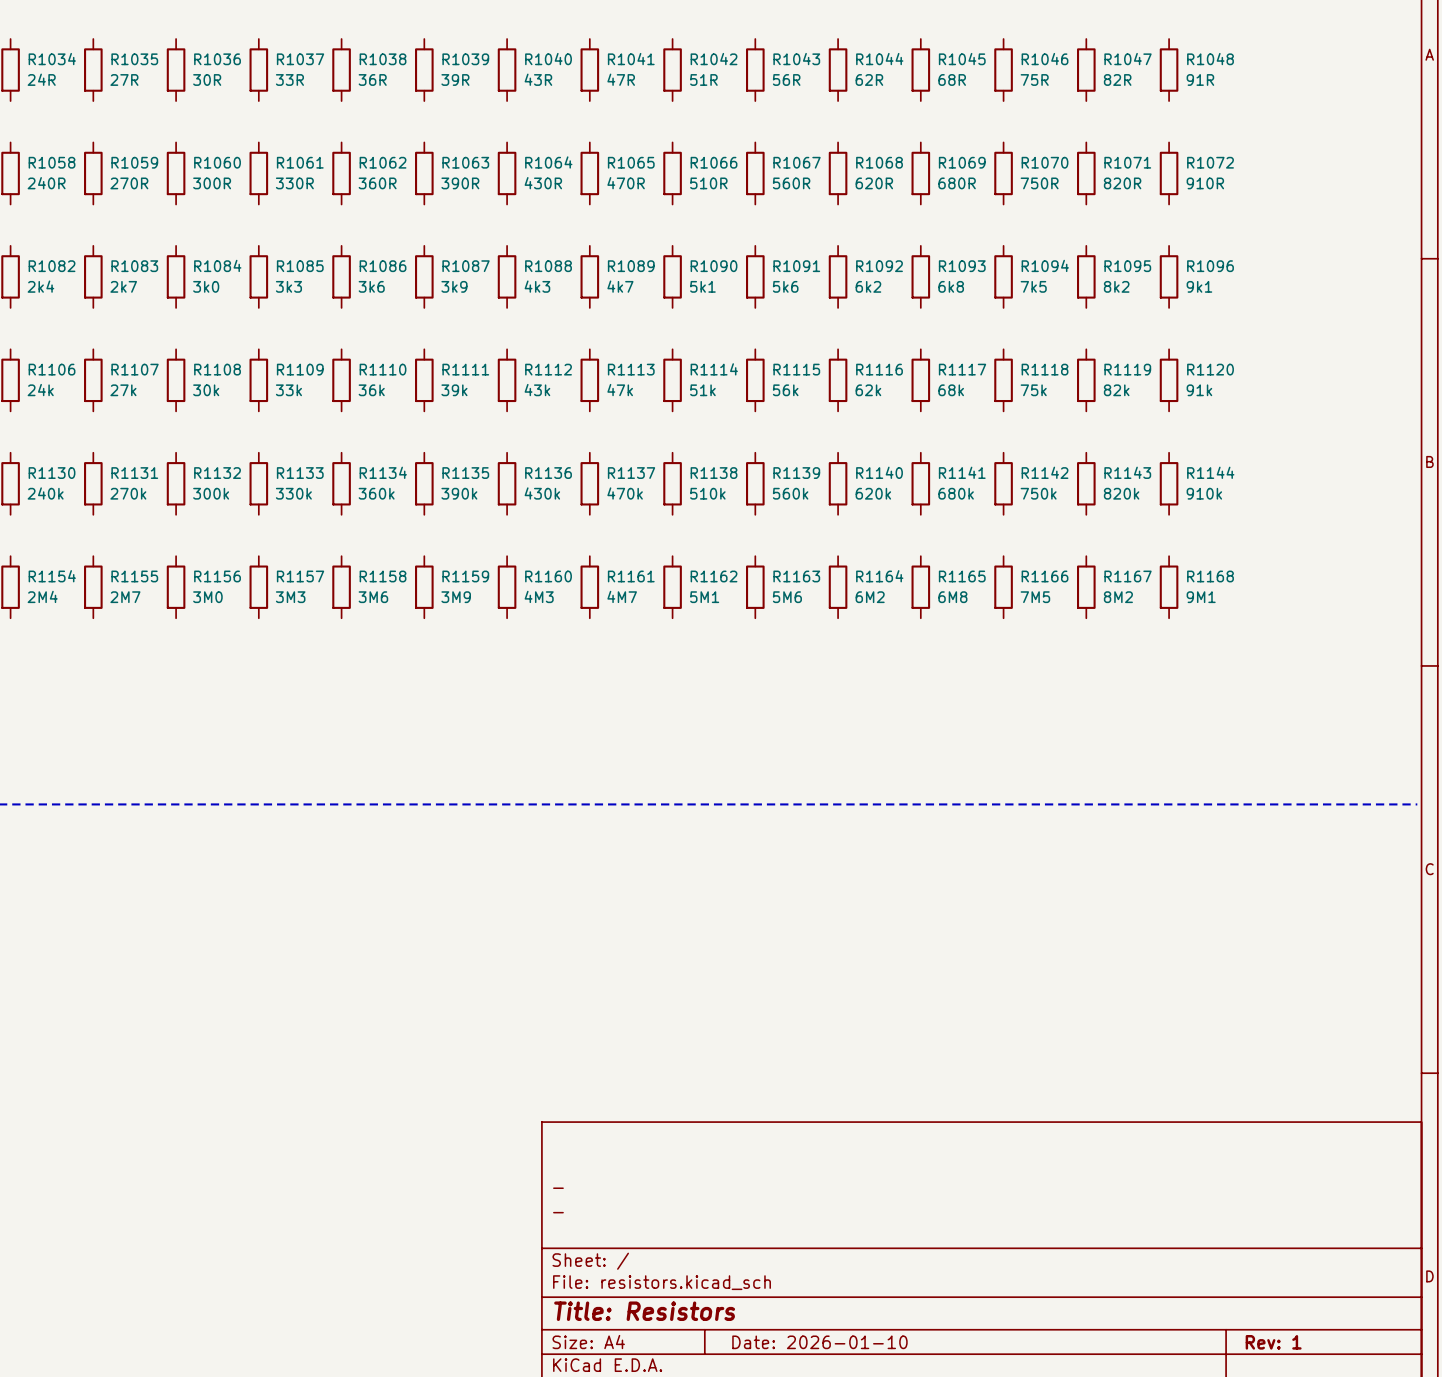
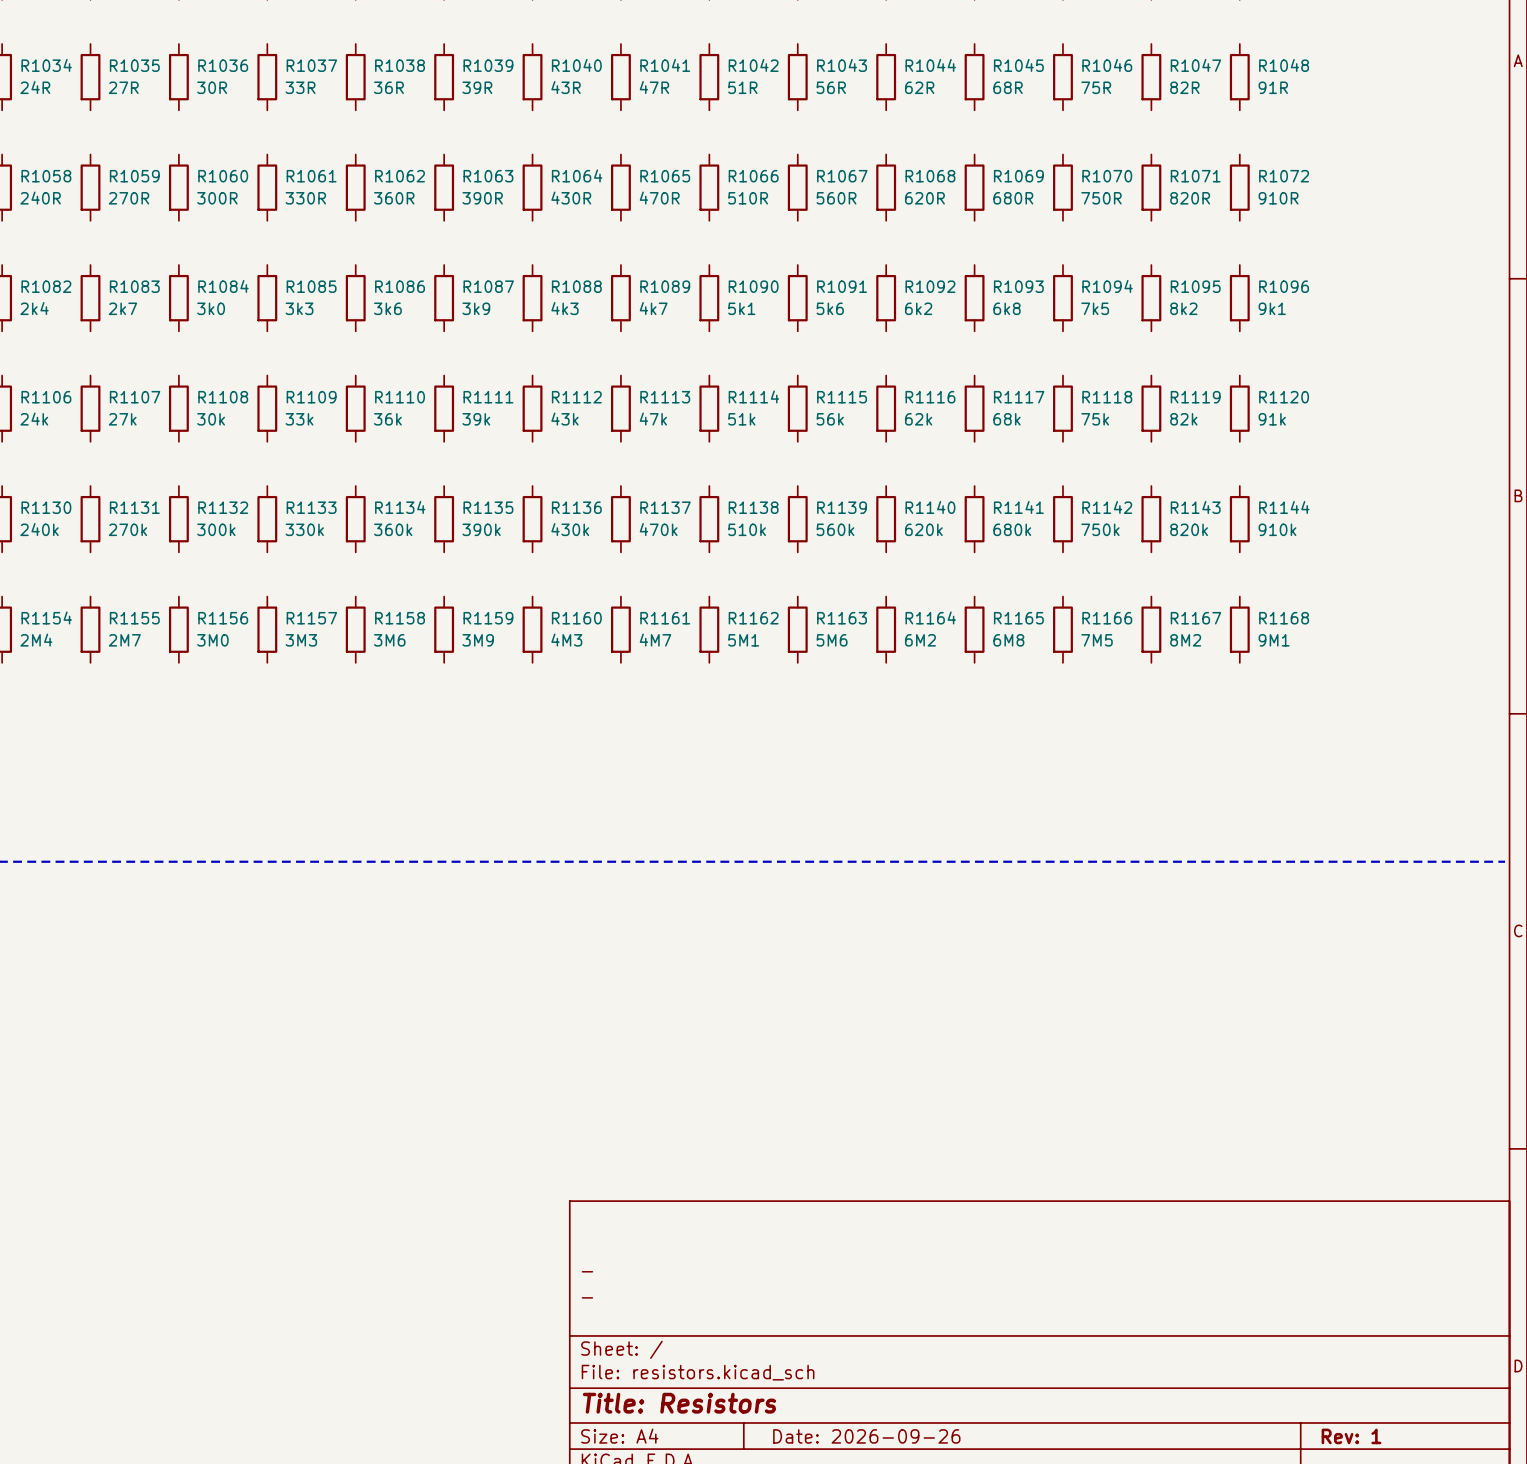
title block: Date: 2026-01-10 (819, 1342) -> Date: 2026-09-26 (866, 1436)

